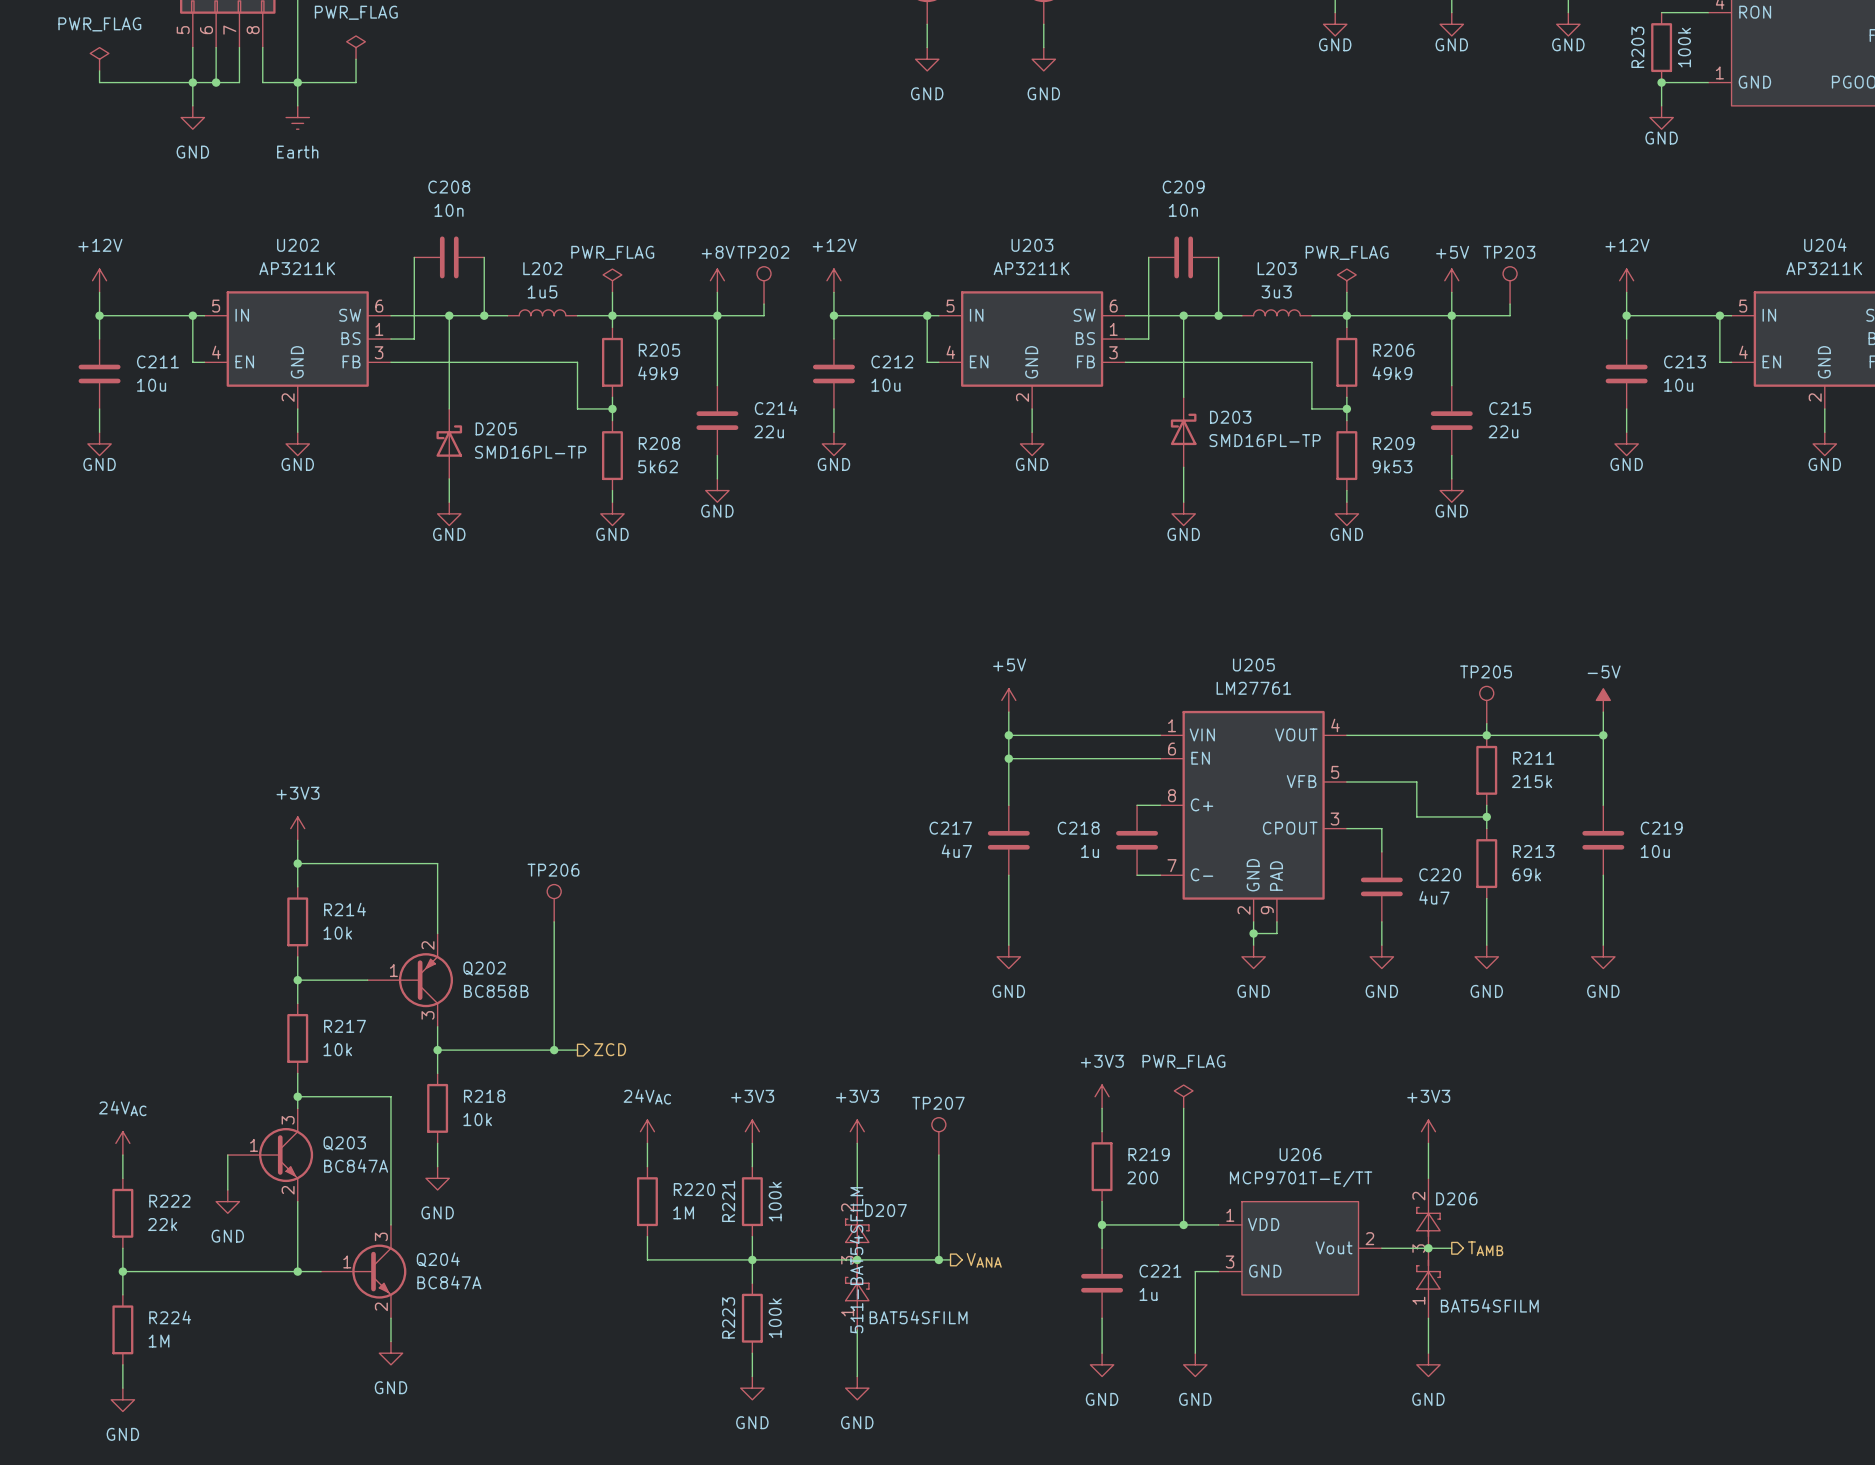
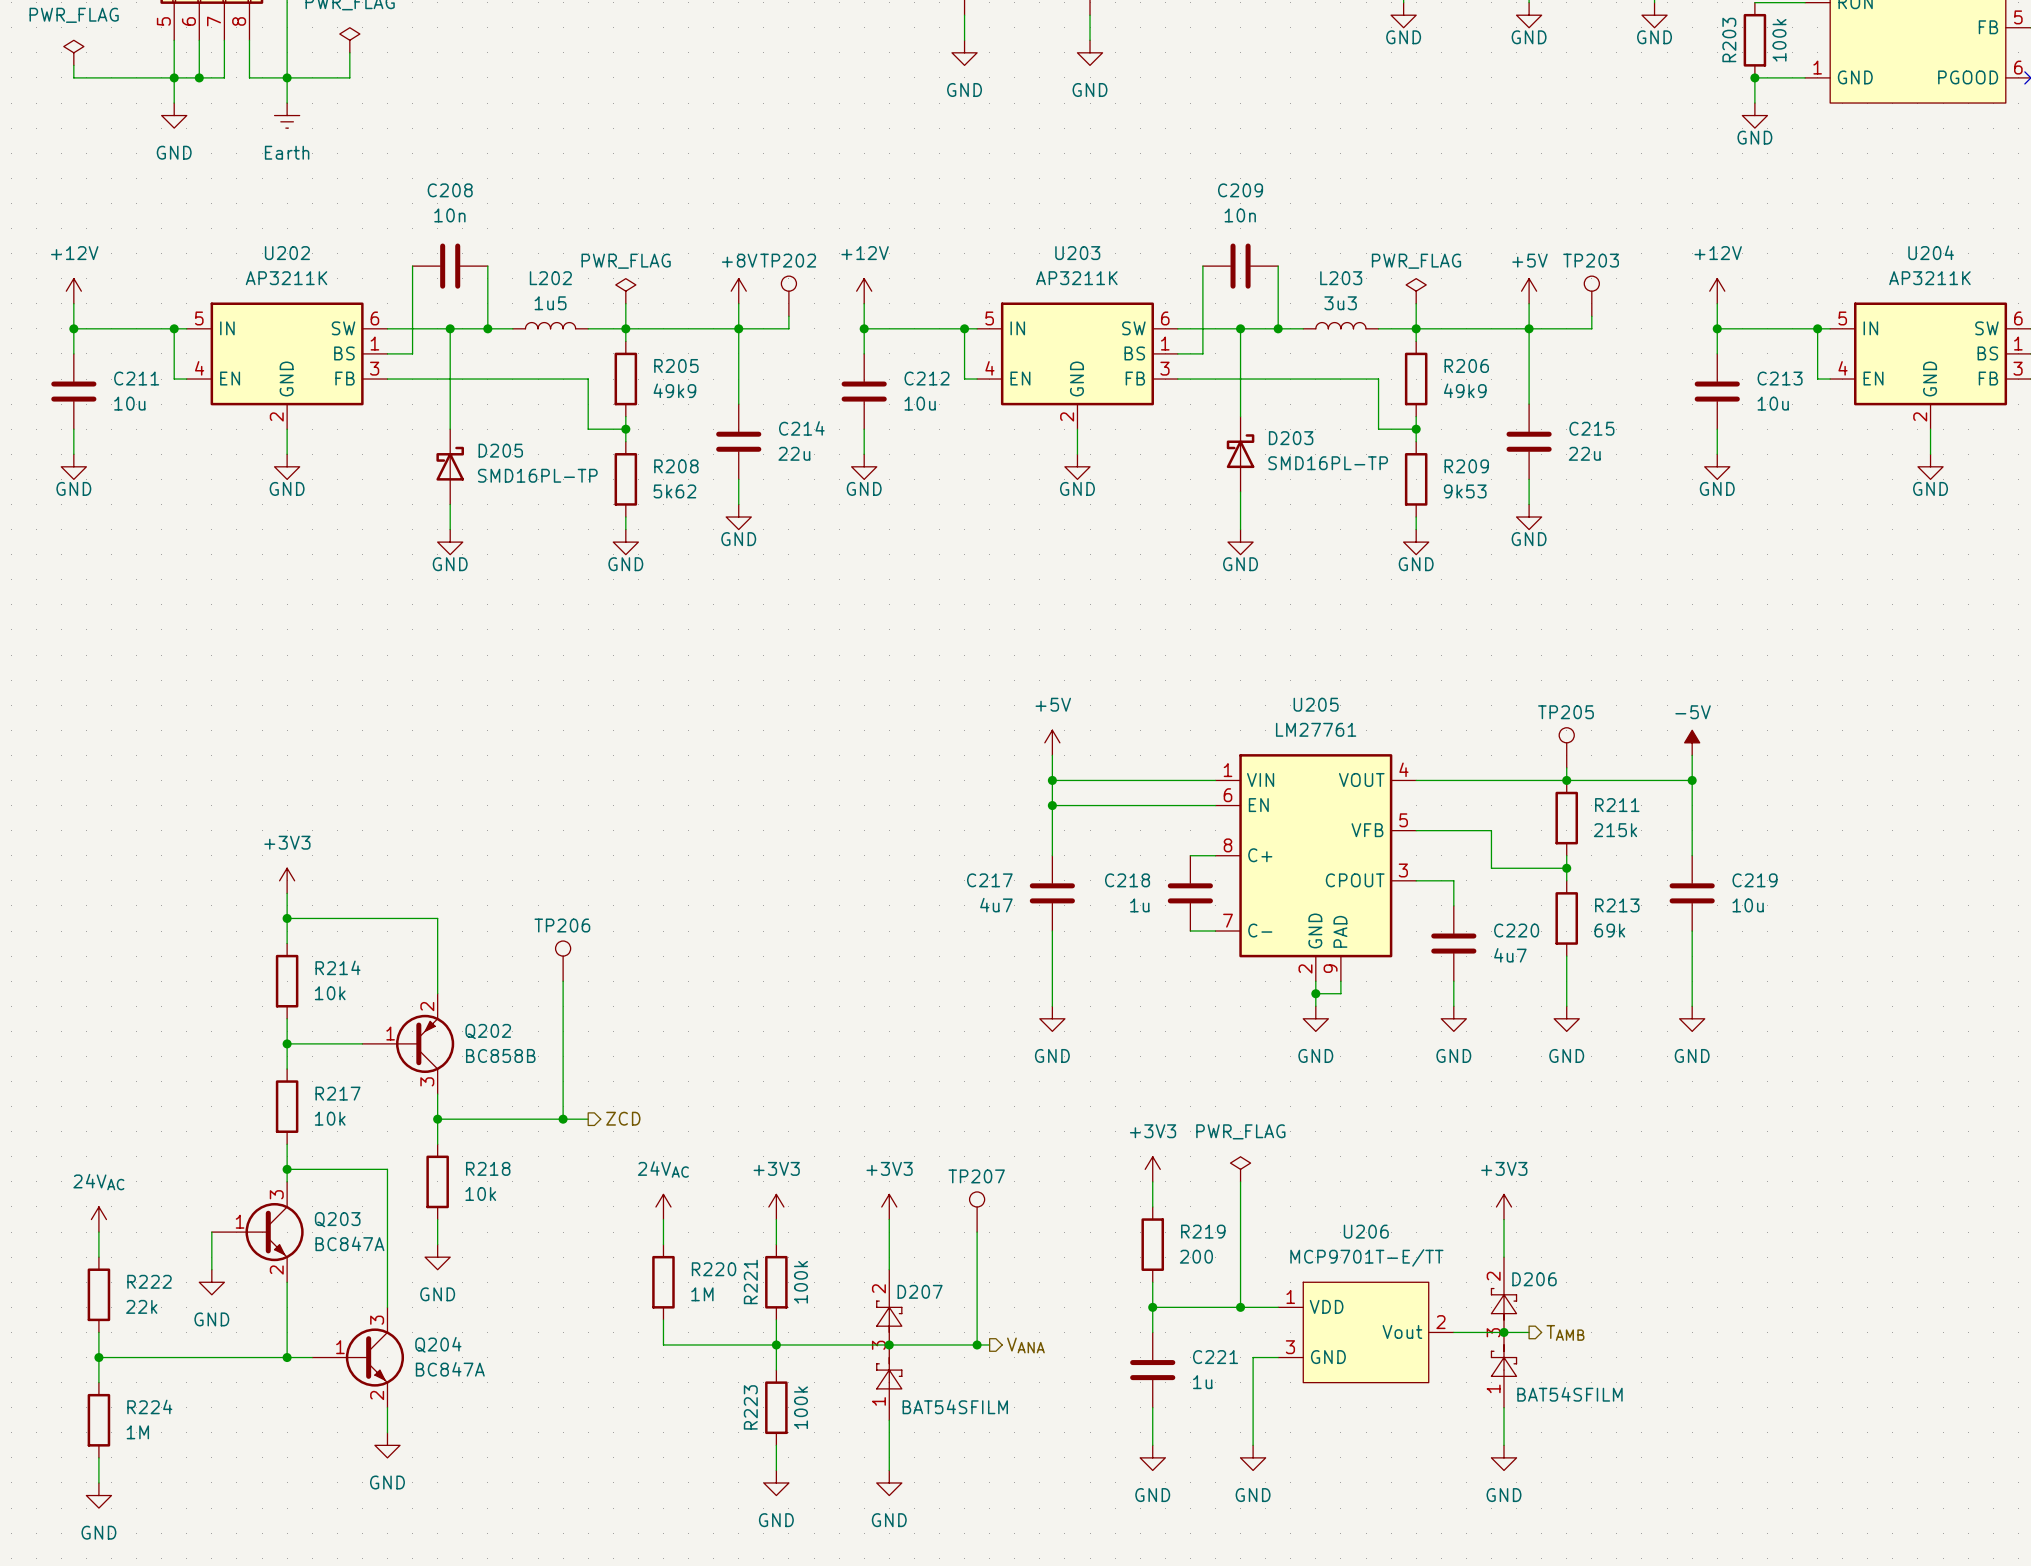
D207 text: 511-BAT54SFILM (856, 1260) -> none

